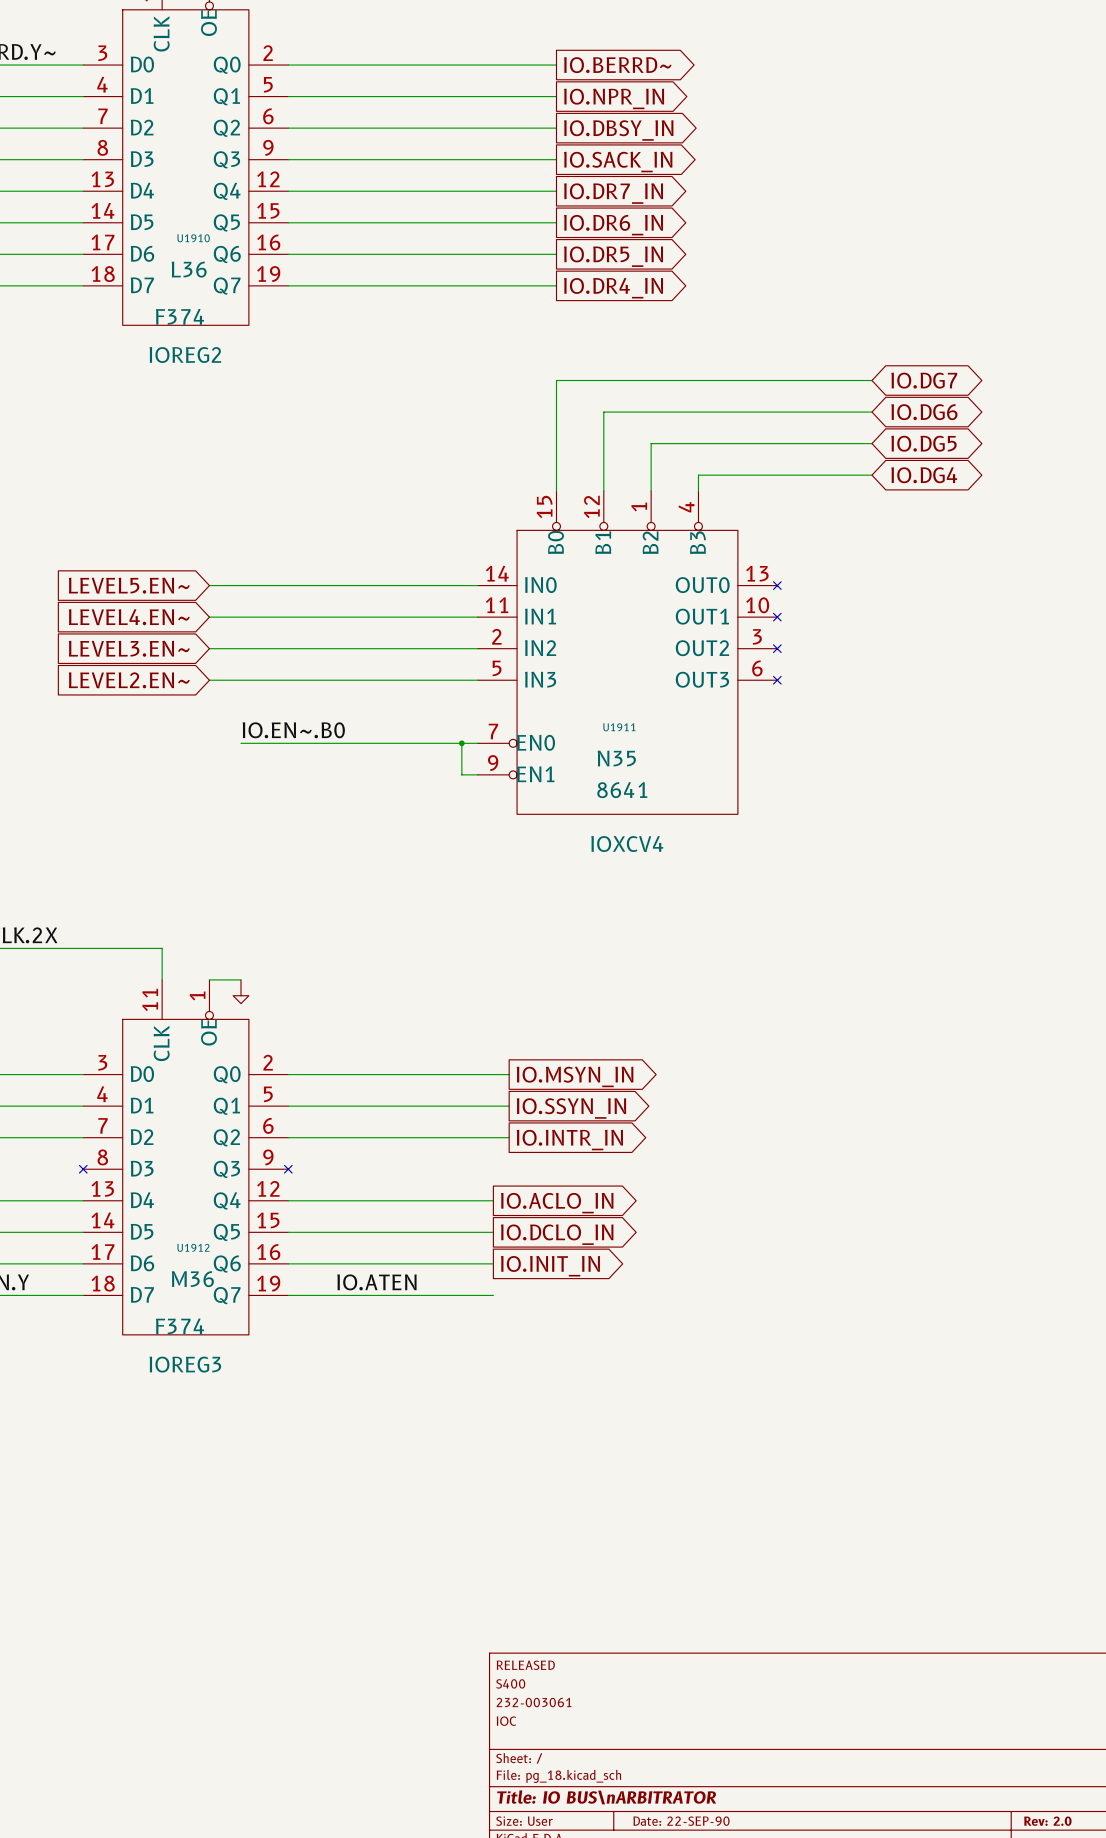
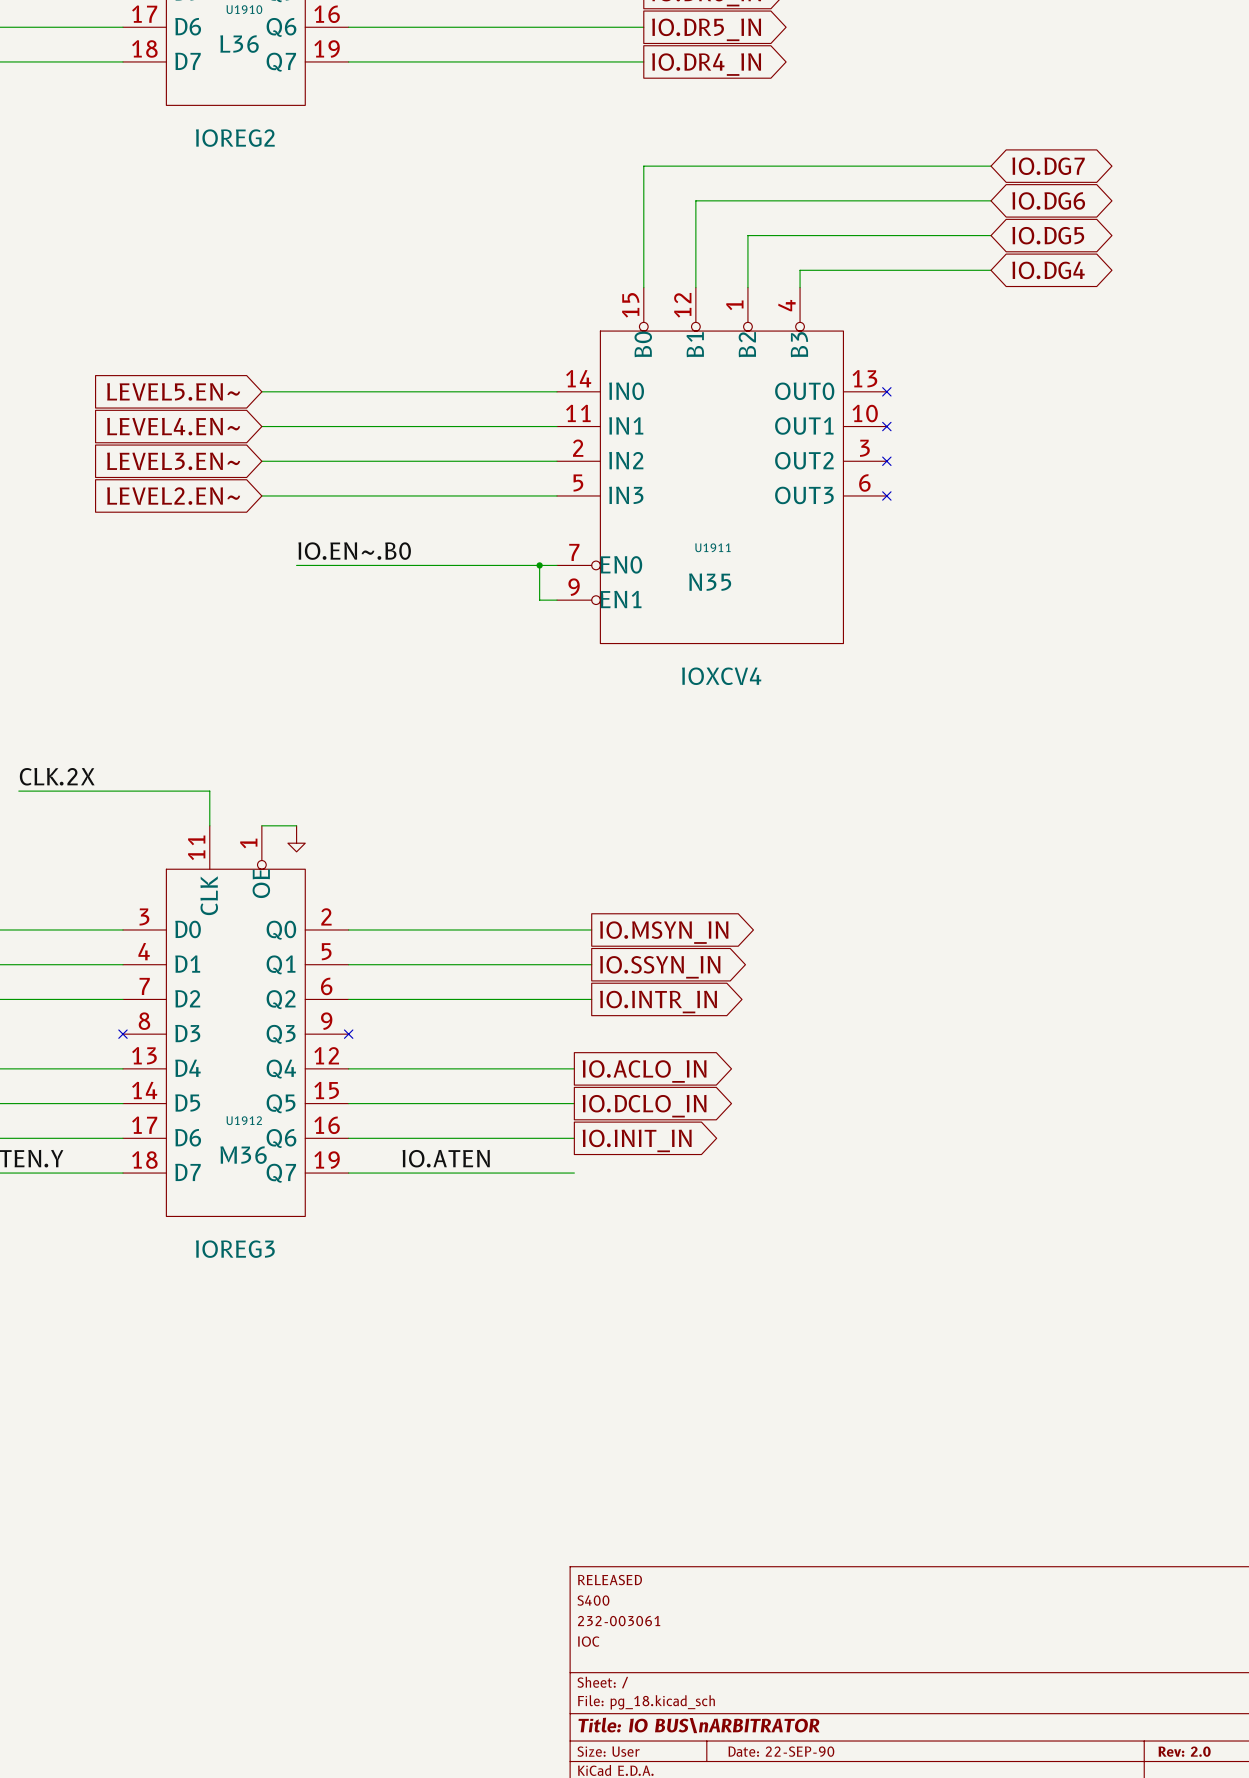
U1910 value: F374 (179, 316) -> none
U1911 value: 8641 (622, 790) -> none
U1912 value: F374 (179, 1326) -> none

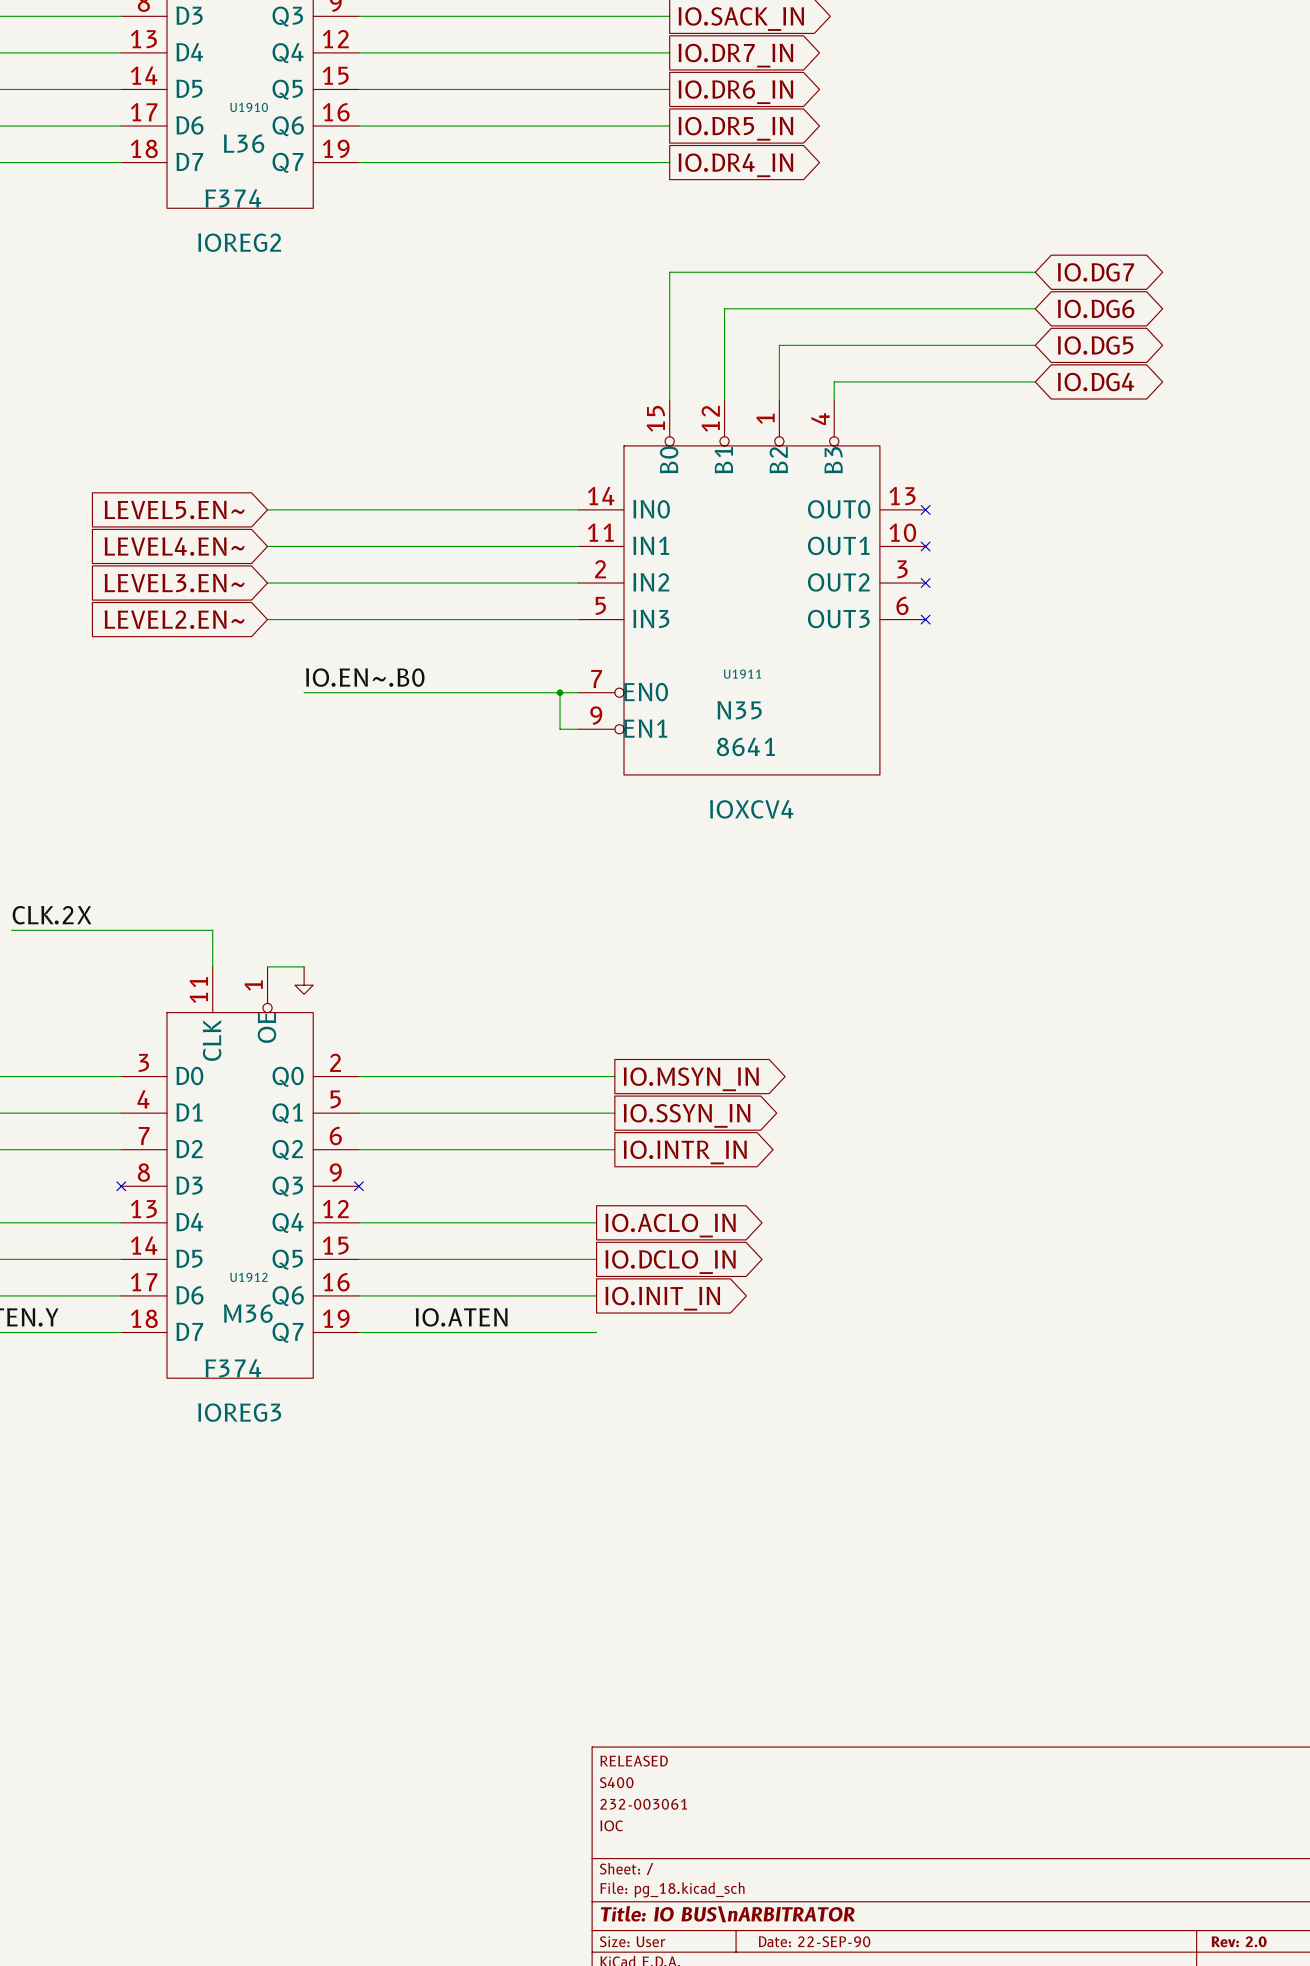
U1910 value: none -> F374 (233, 198)
U1911 value: none -> 8641 (745, 746)
U1912 value: none -> F374 (233, 1368)

